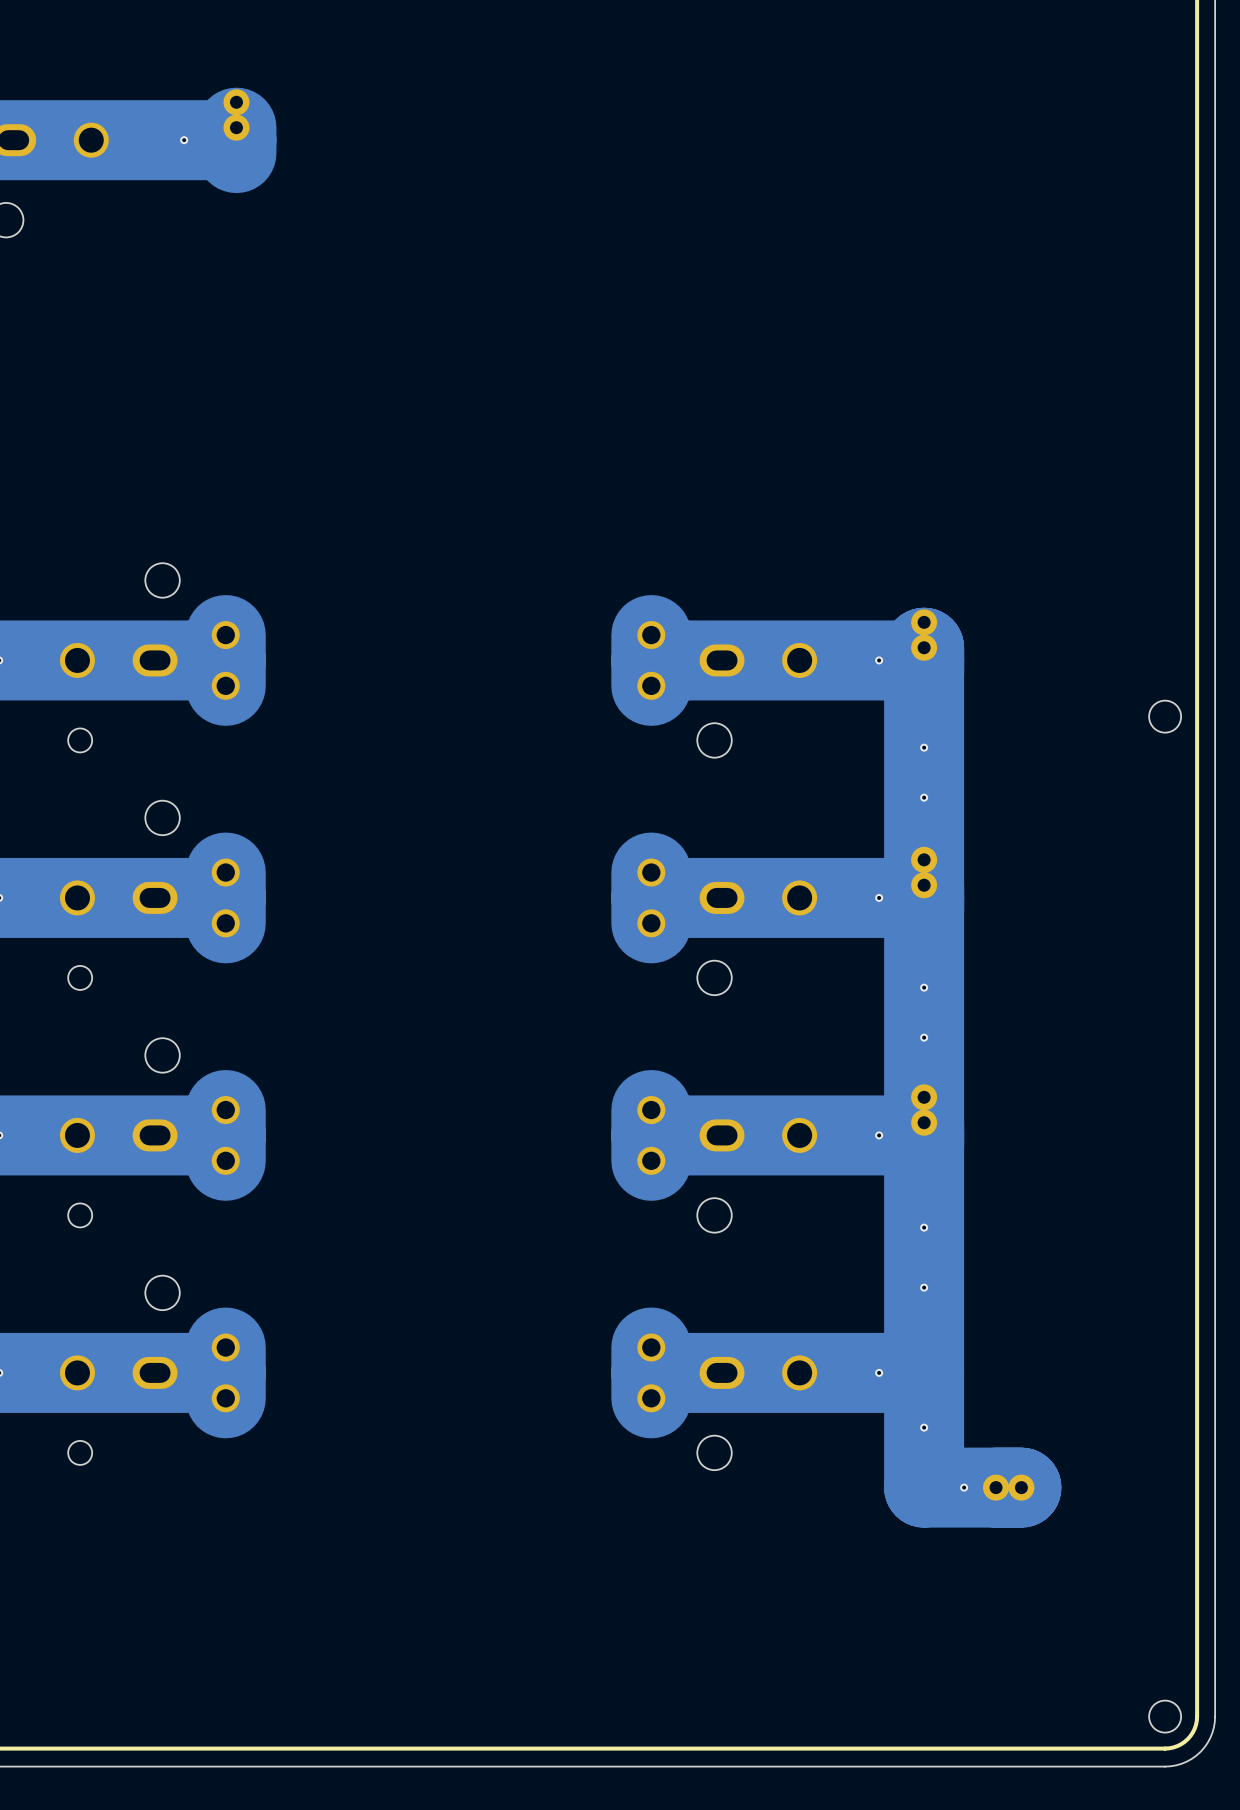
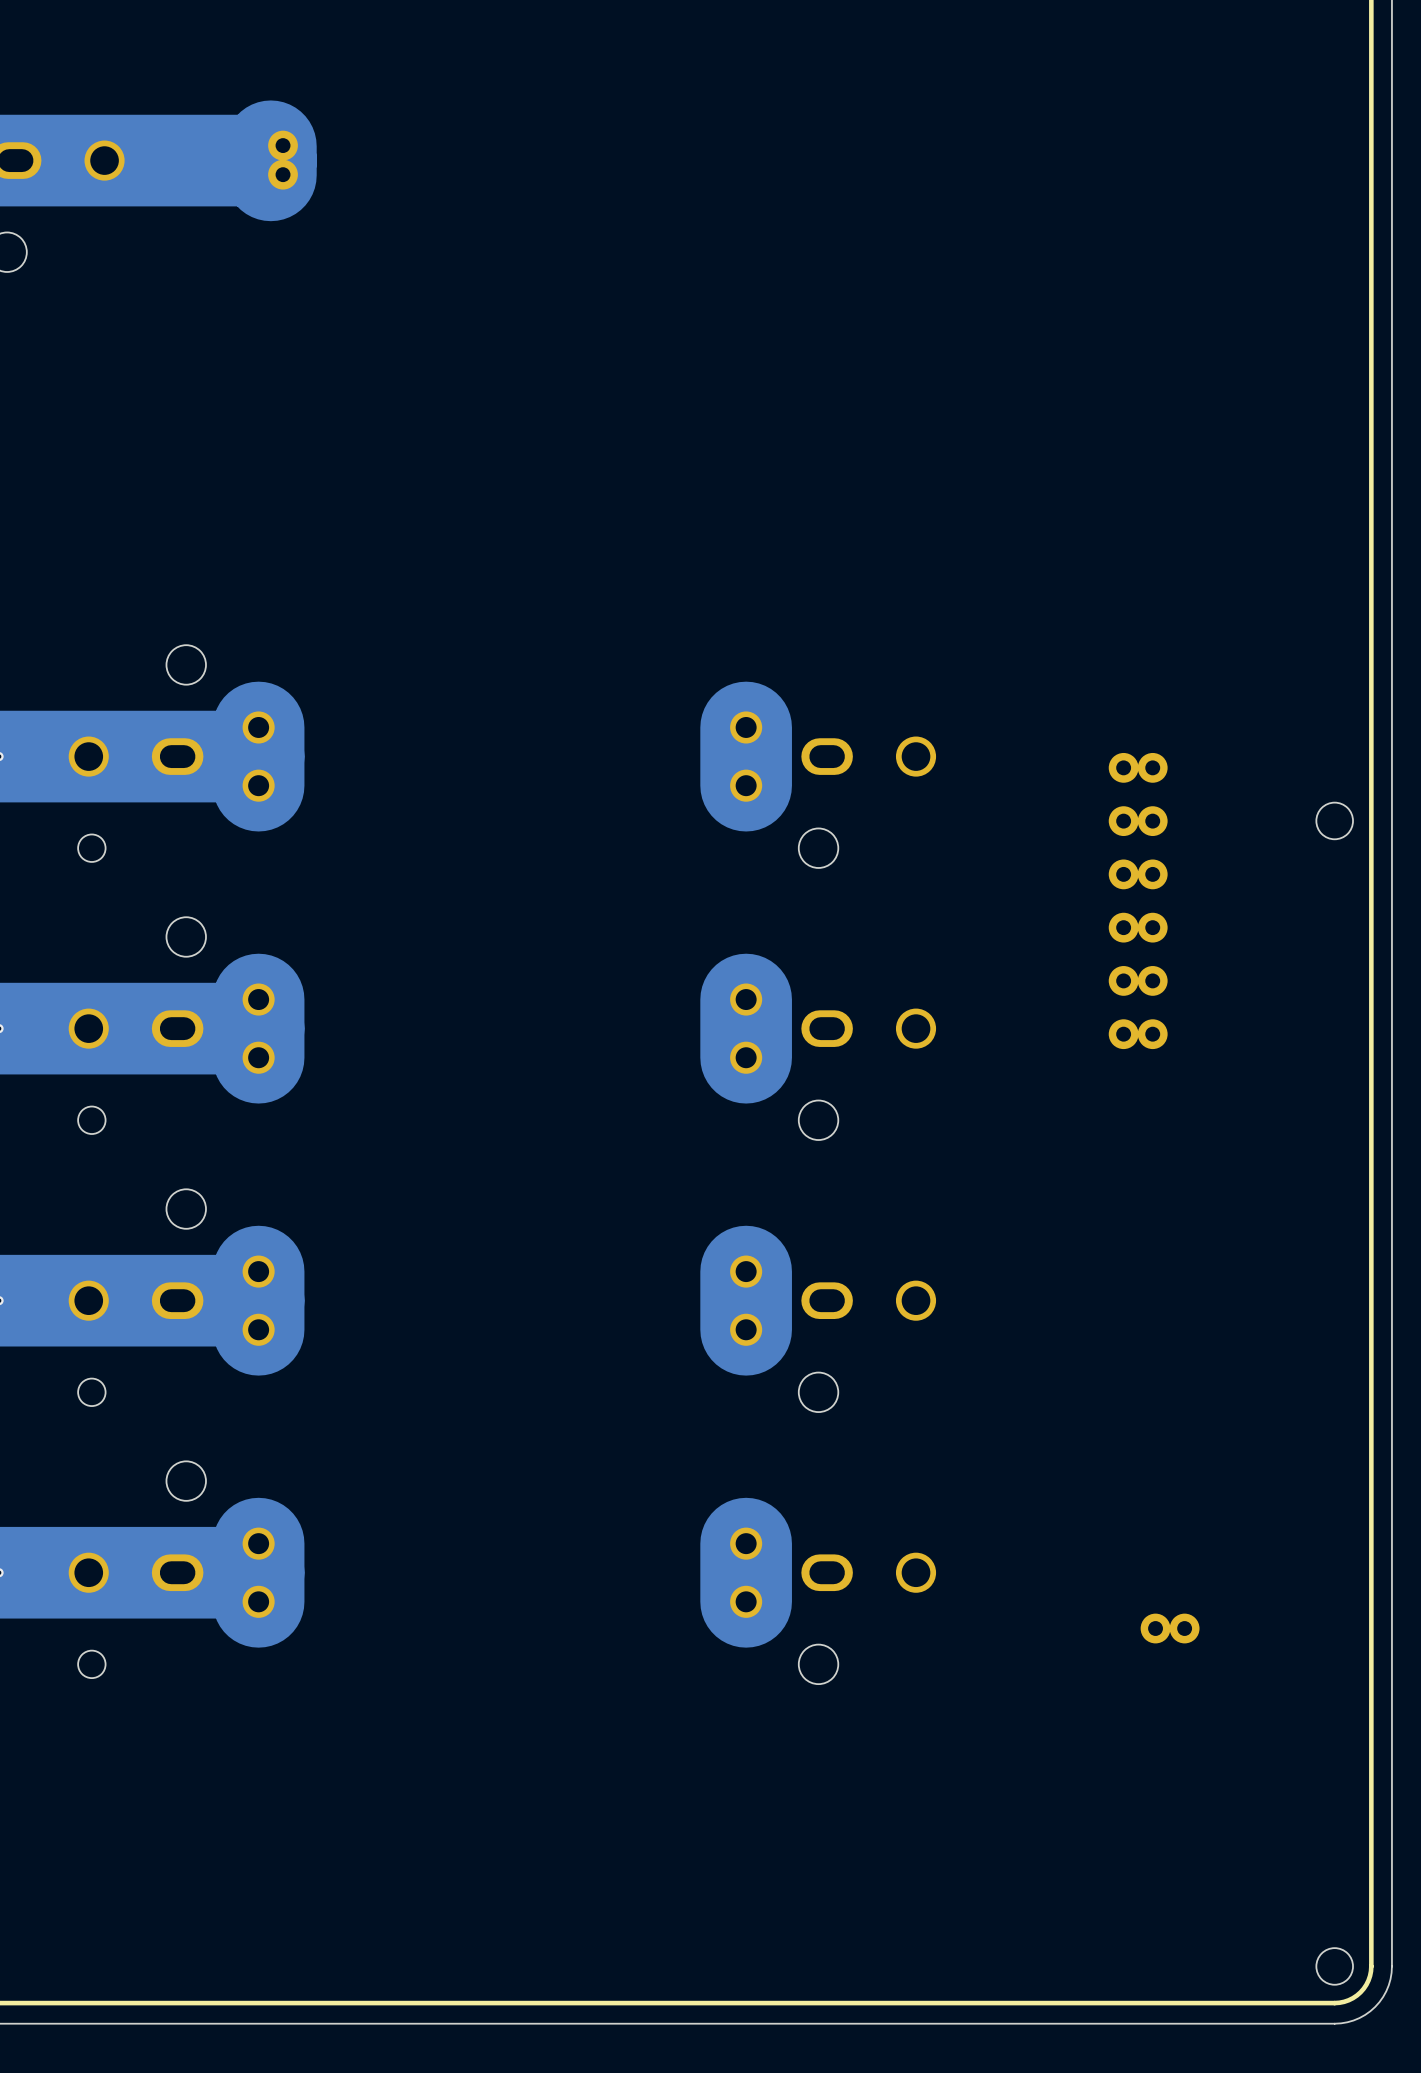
part position: (236, 114) -> (283, 160)
via: (184, 140) -> none
part: (924, 635) -> none
track: (924, 647) (924, 1487) (1021, 1487) -> none
via: (879, 660) -> none
track: (924, 660) (651, 660) -> none
part: none -> (1138, 767)
part: none -> (1138, 821)
via: (924, 747) -> none
part: none -> (1138, 874)
via: (924, 797) -> none
part: none -> (1138, 927)
part: none -> (1138, 980)
part: (924, 872) -> none
via: (879, 897) -> none
track: (924, 897) (651, 897) -> none
part: none -> (1138, 1034)
via: (924, 987) -> none
via: (924, 1037) -> none
part: (924, 1110) -> none
via: (879, 1135) -> none
track: (924, 1135) (651, 1135) -> none
via: (924, 1227) -> none
via: (924, 1287) -> none
via: (879, 1372) -> none
track: (924, 1372) (651, 1372) -> none
via: (924, 1427) -> none
via: (964, 1487) -> none
part position: (1008, 1487) -> (1170, 1628)

